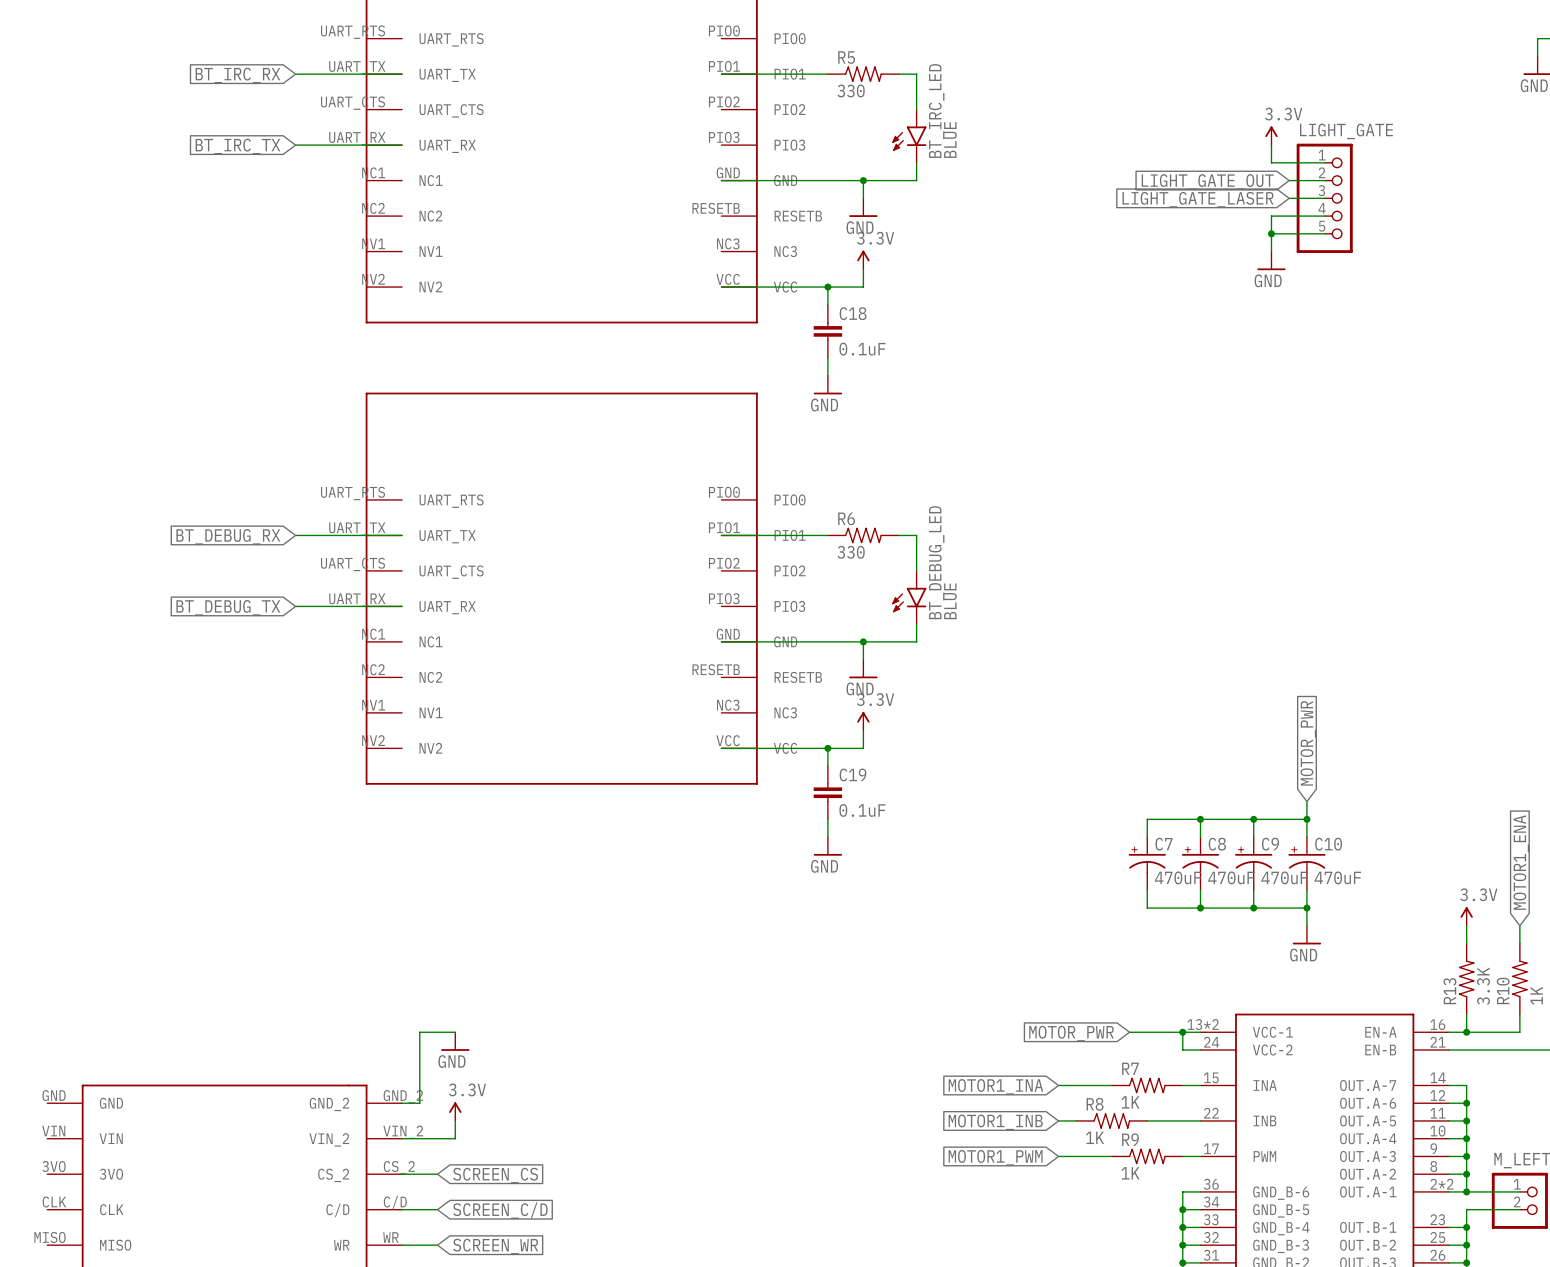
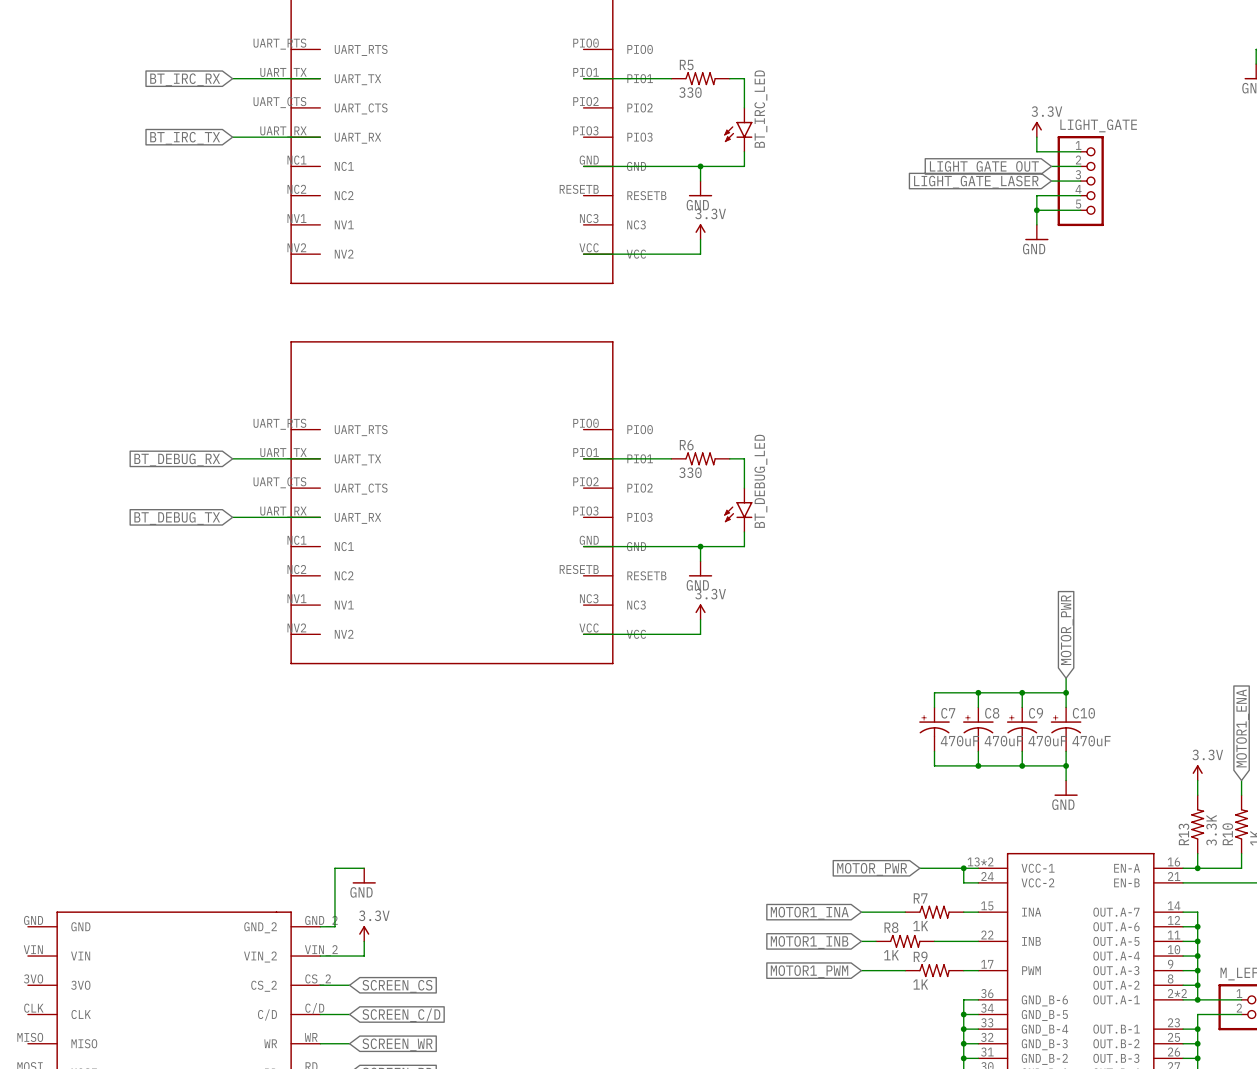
BT_IRC_LED value: BLUE (950, 140) -> none
wire: (827, 287) (827, 304) -> none
junction: (827, 287) -> none
C18: 0.1uF (827, 331) -> none
wire: (827, 358) (827, 375) -> none
power symbol: GND (827, 385) -> none
BT_DEBUG_LED value: BLUE (950, 601) -> none
wire: (827, 748) (827, 766) -> none
junction: (827, 748) -> none
C19: 0.1uF (827, 792) -> none
wire: (827, 819) (827, 837) -> none
power symbol: GND (827, 846) -> none

